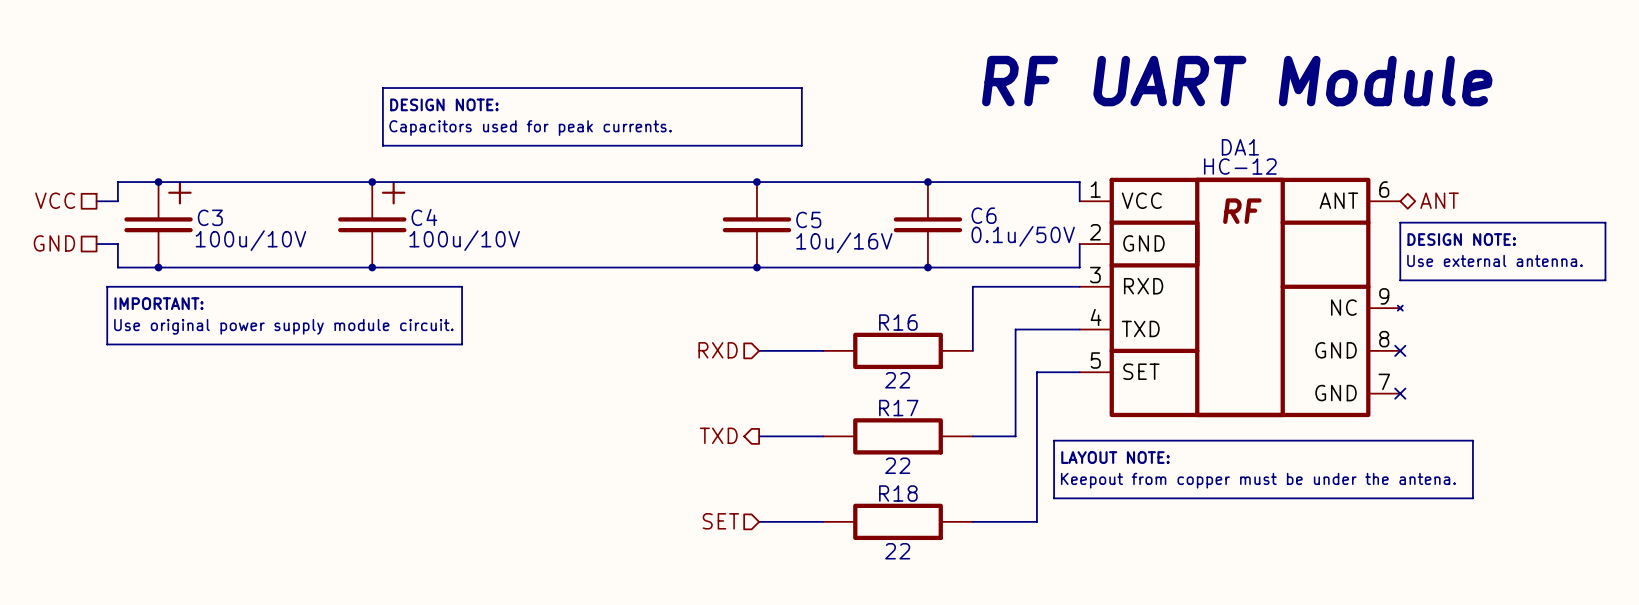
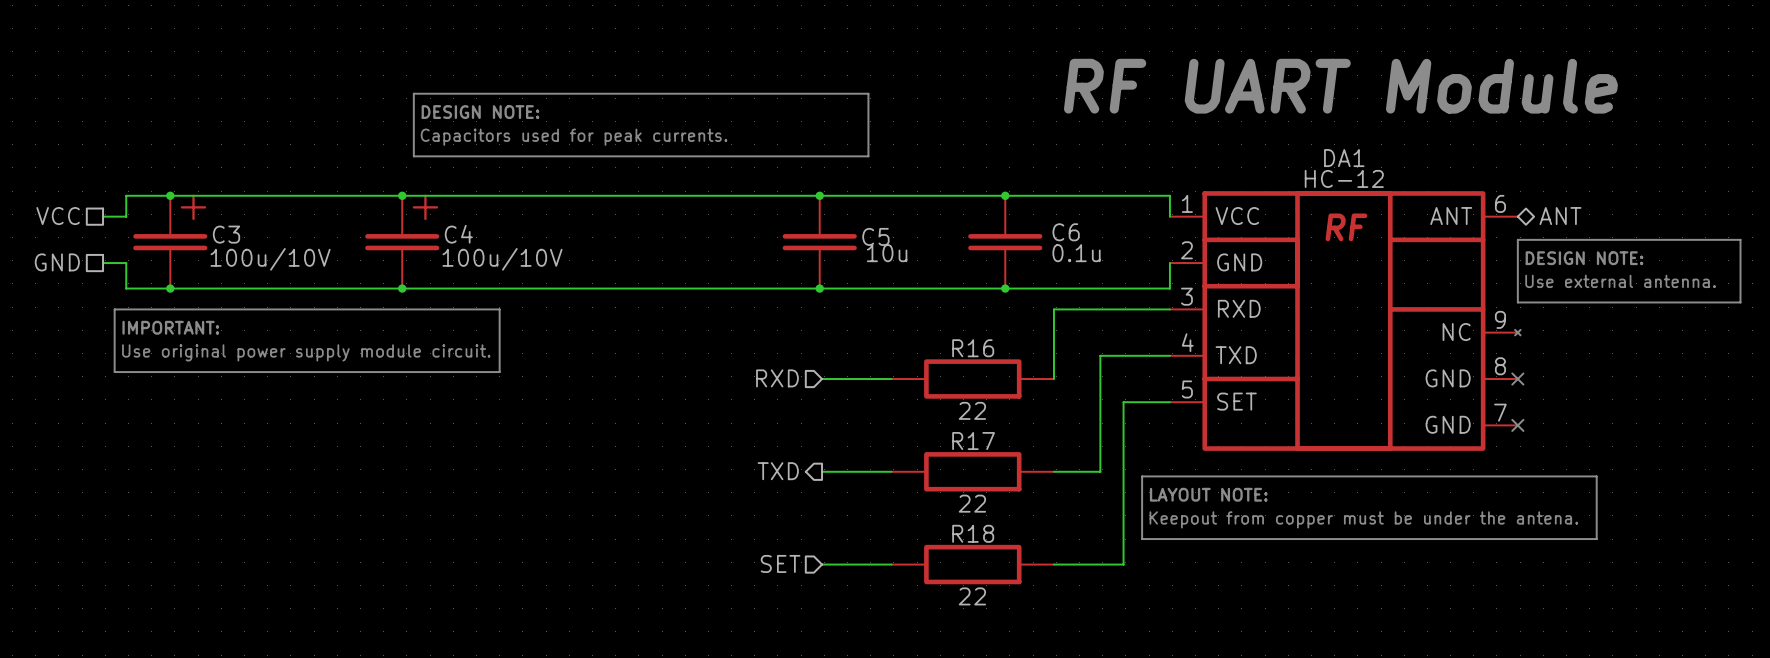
C6 value: 0.1u/50V (1023, 236) -> 0.1u (1076, 253)
C5 value: 10u/16V (844, 242) -> 10u (887, 253)

